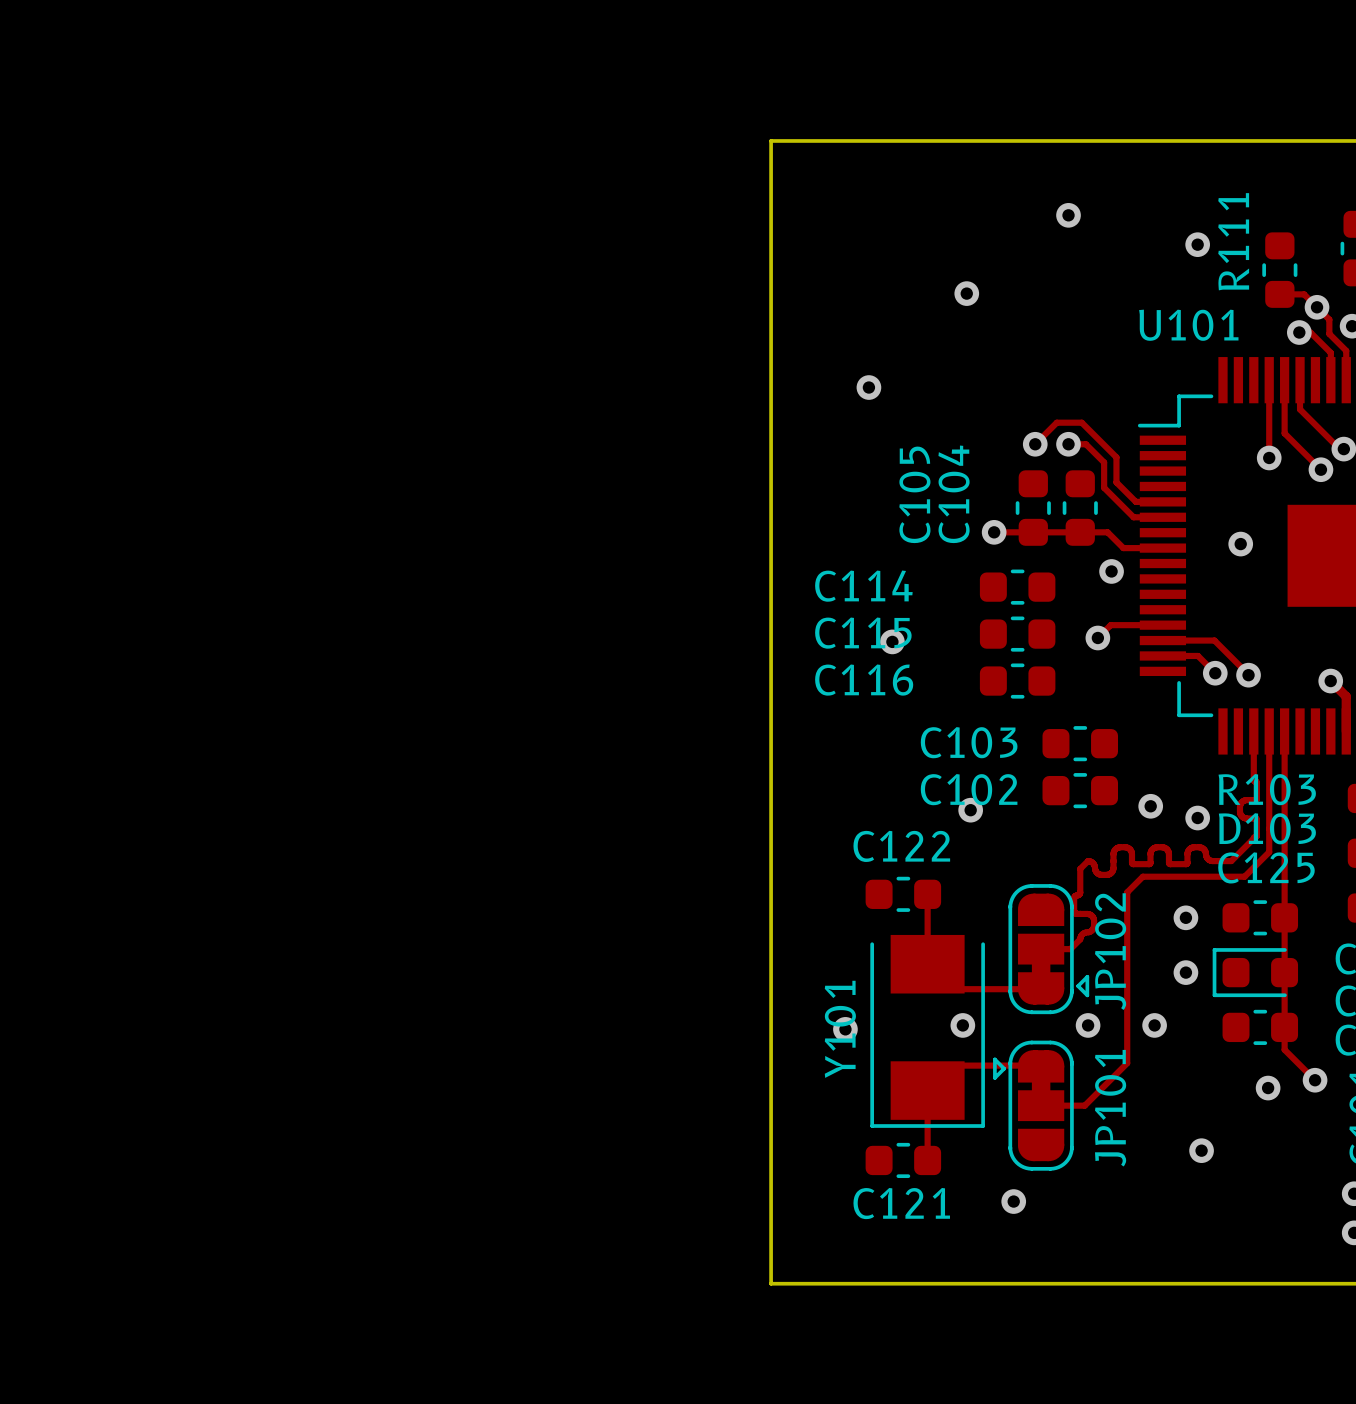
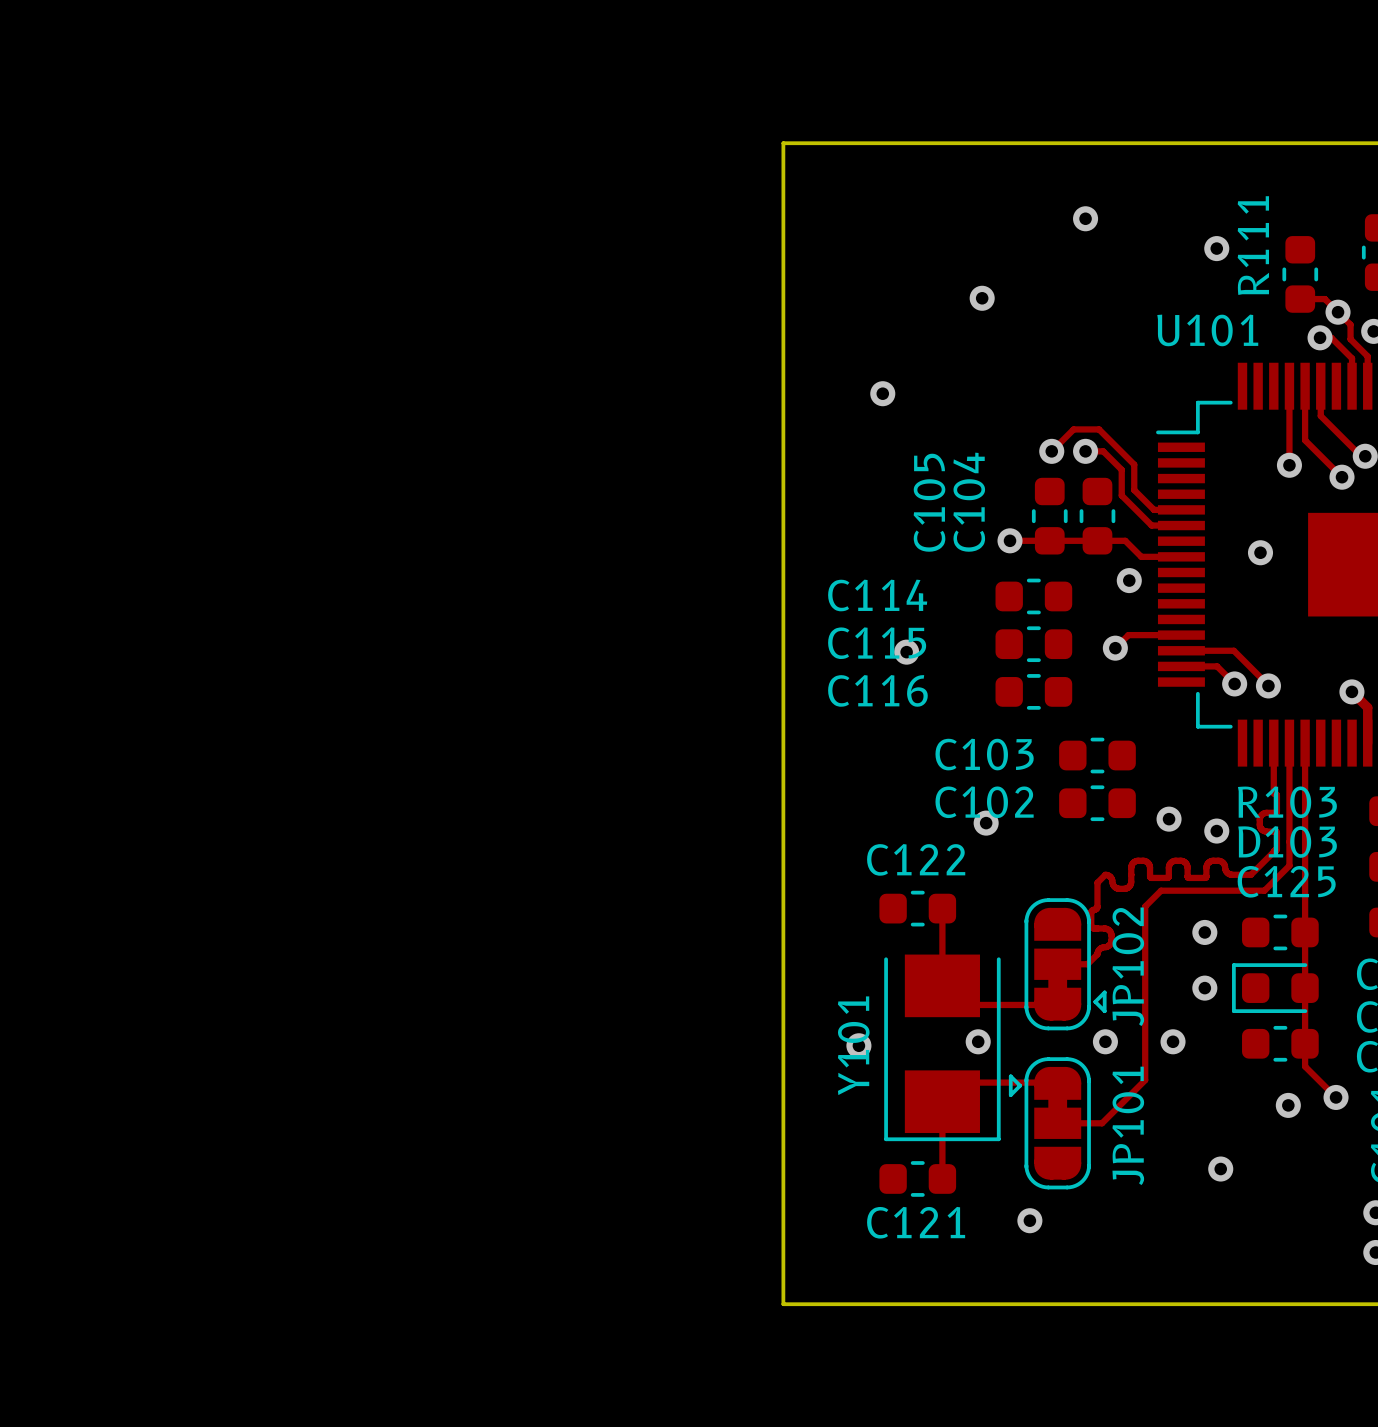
Y101 footprint: [870, 934, 985, 1128] -> [884, 954, 1001, 1142]

